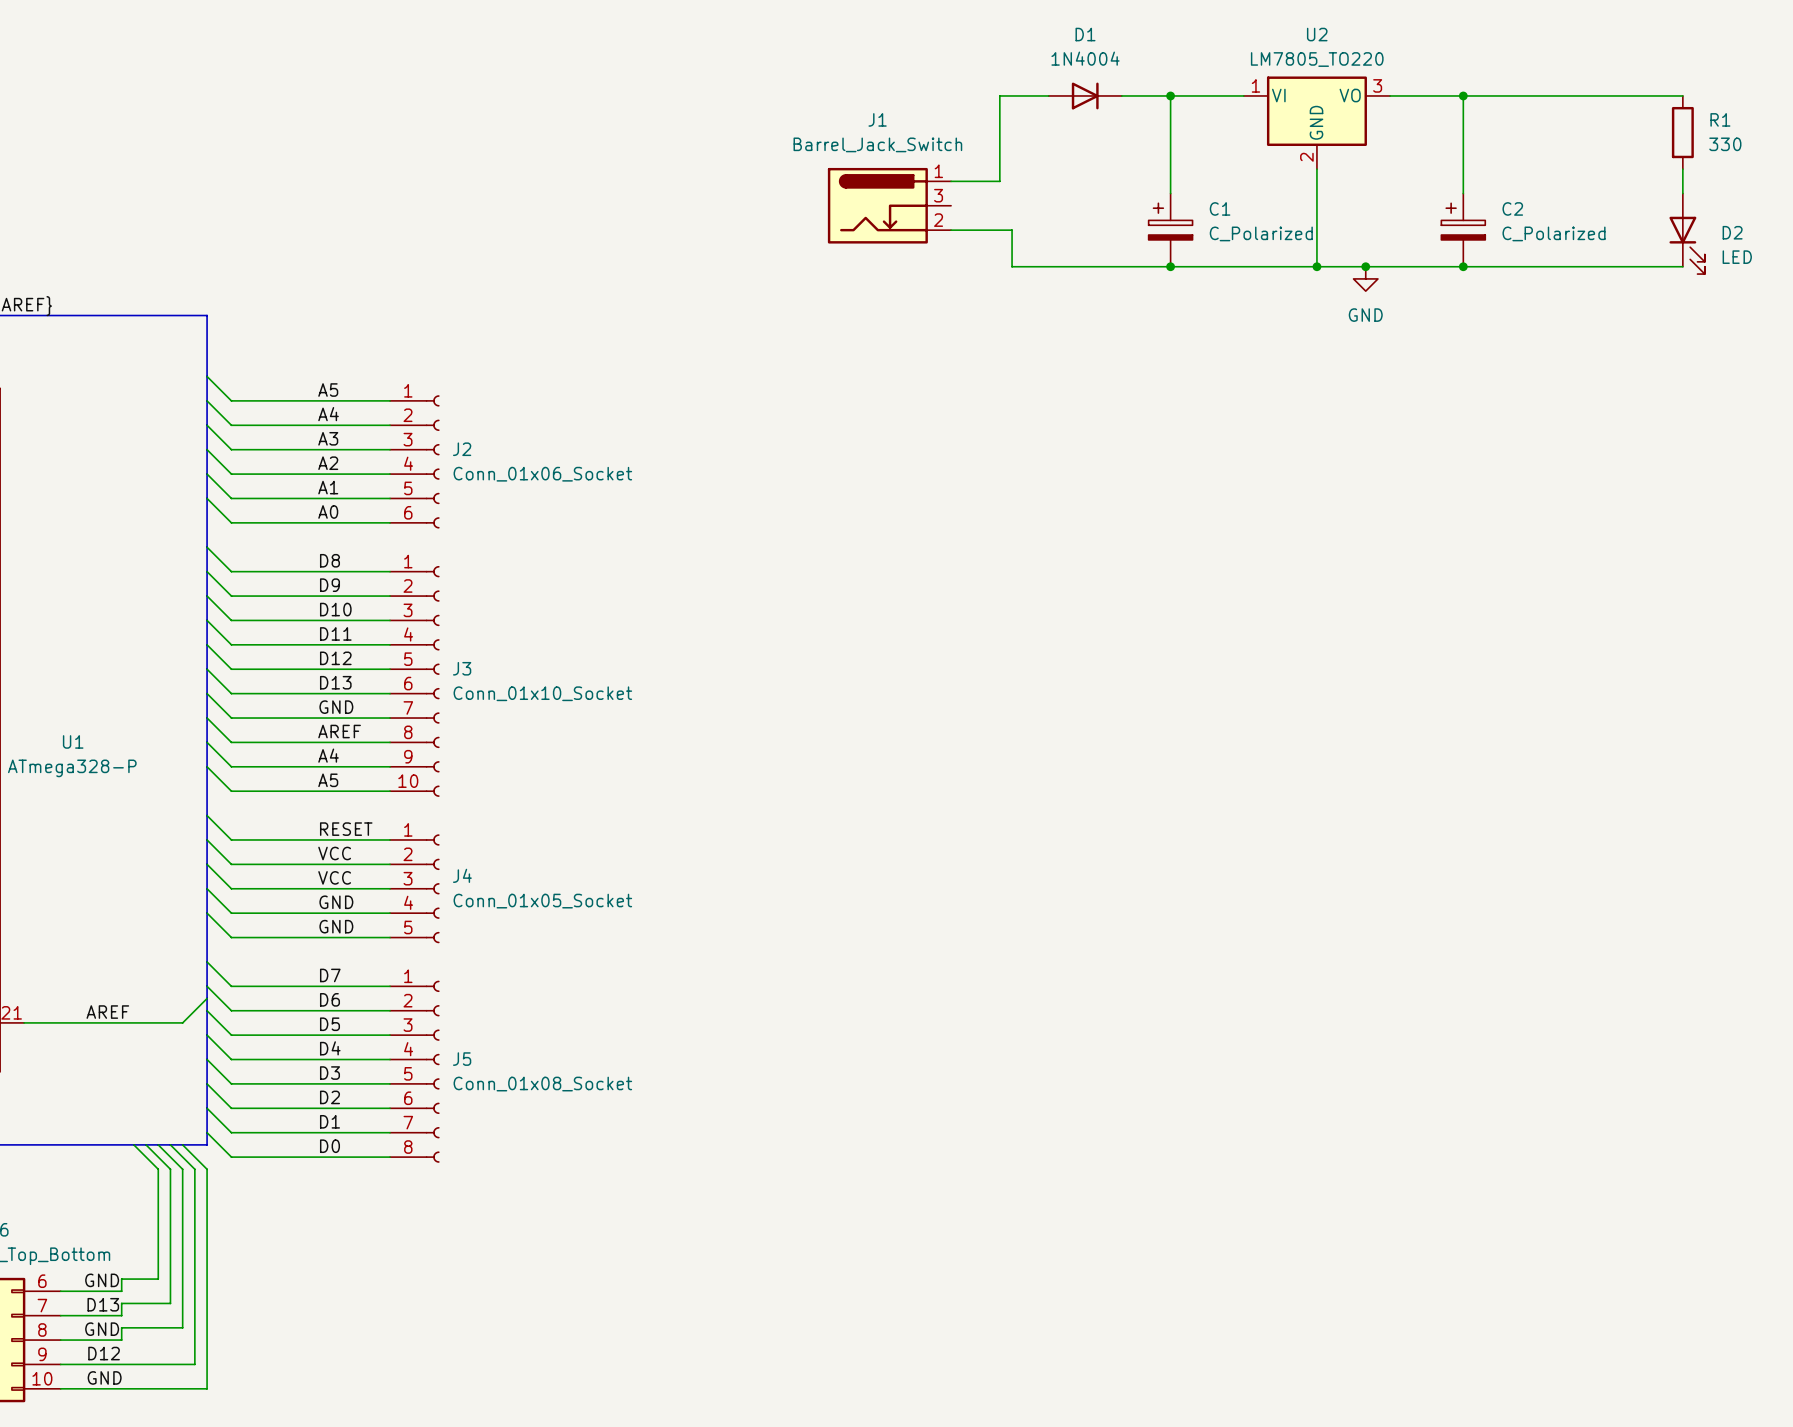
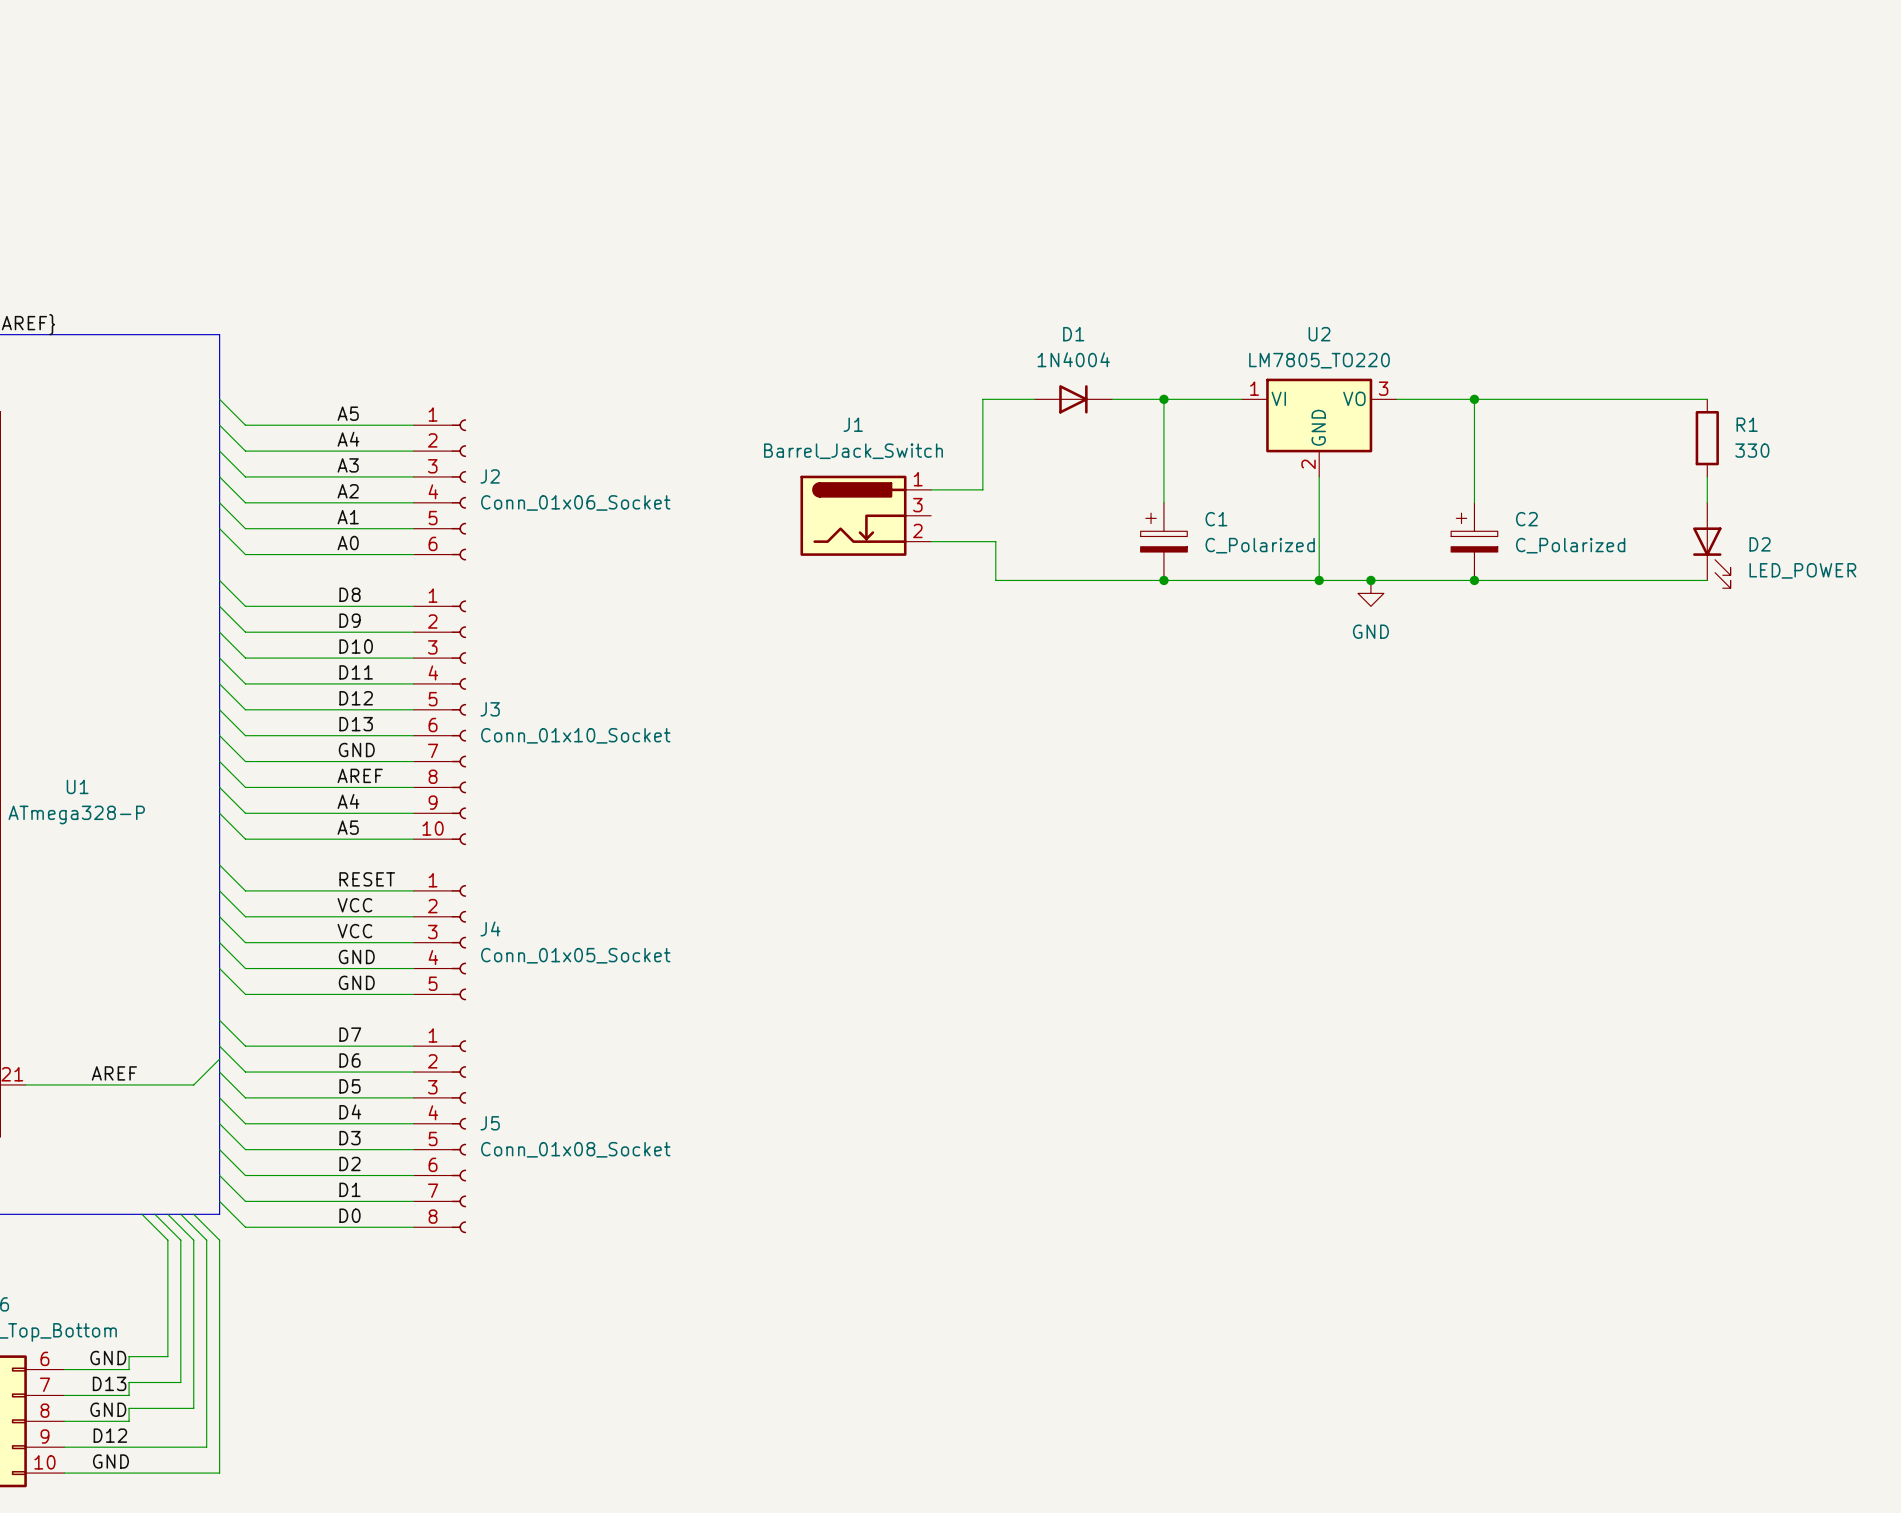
wire: (1048, 95) (999, 95) (999, 181) (951, 181) -> none
D1 position: (1085, 95) -> (1073, 399)
wire: (1121, 95) (1243, 95) -> none
wire: (1170, 95) (1170, 193) -> none
junction: (1170, 95) -> none
wire: (1390, 95) (1682, 95) -> none
wire: (1463, 95) (1463, 193) -> none
junction: (1463, 95) -> none
U2 position: (1316, 122) -> (1319, 427)
R1 position: (1682, 132) -> (1707, 438)
wire: (1316, 169) (1316, 266) -> (1474, 399) (1474, 502)
wire: (1682, 169) (1682, 193) -> none
J1 position: (889, 205) -> (865, 515)
wire: (951, 230) (1012, 230) (1012, 266) (1682, 266) -> none
C1 position: (1170, 230) -> (1163, 541)
C2 position: (1463, 230) -> (1474, 541)
D2 position: (1687, 233) -> (1711, 545)
D2 value: LED (1737, 257) -> LED_POWER (1802, 570)
junction: (1170, 266) -> none
junction: (1316, 266) -> none
junction: (1365, 266) -> none
junction: (1463, 266) -> none
power symbol: GND (1365, 278) -> none
wire: none -> (1034, 399) (982, 399) (982, 489) (931, 489)
wire: none -> (1112, 399) (1241, 399)
wire: none -> (1163, 399) (1163, 502)
junction: none -> (1163, 399)
wire: none -> (1396, 399) (1707, 399)
junction: none -> (1474, 399)
wire: none -> (1319, 476) (1319, 580)
wire: none -> (1707, 476) (1707, 502)
wire: none -> (931, 541) (995, 541) (995, 580) (1707, 580)
junction: none -> (1163, 580)
junction: none -> (1319, 580)
junction: none -> (1370, 580)
junction: none -> (1474, 580)
power symbol: none -> GND (1370, 593)

